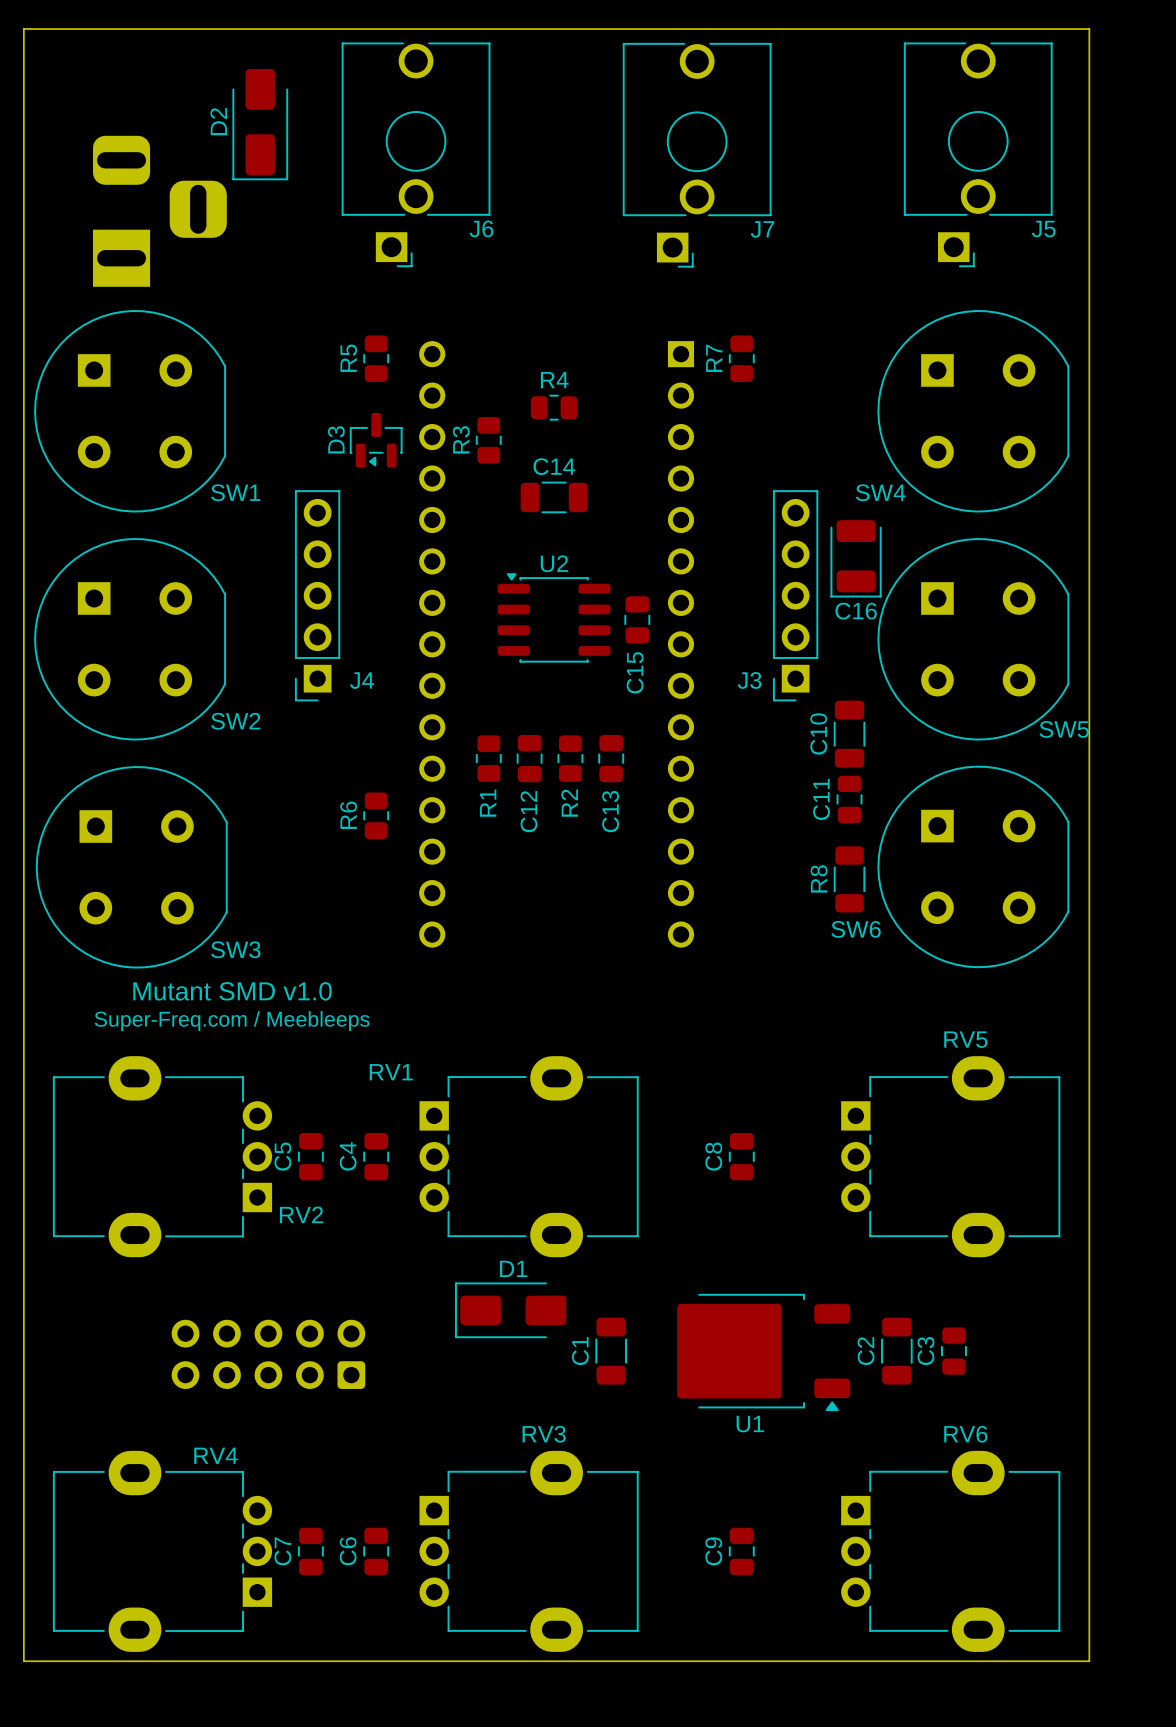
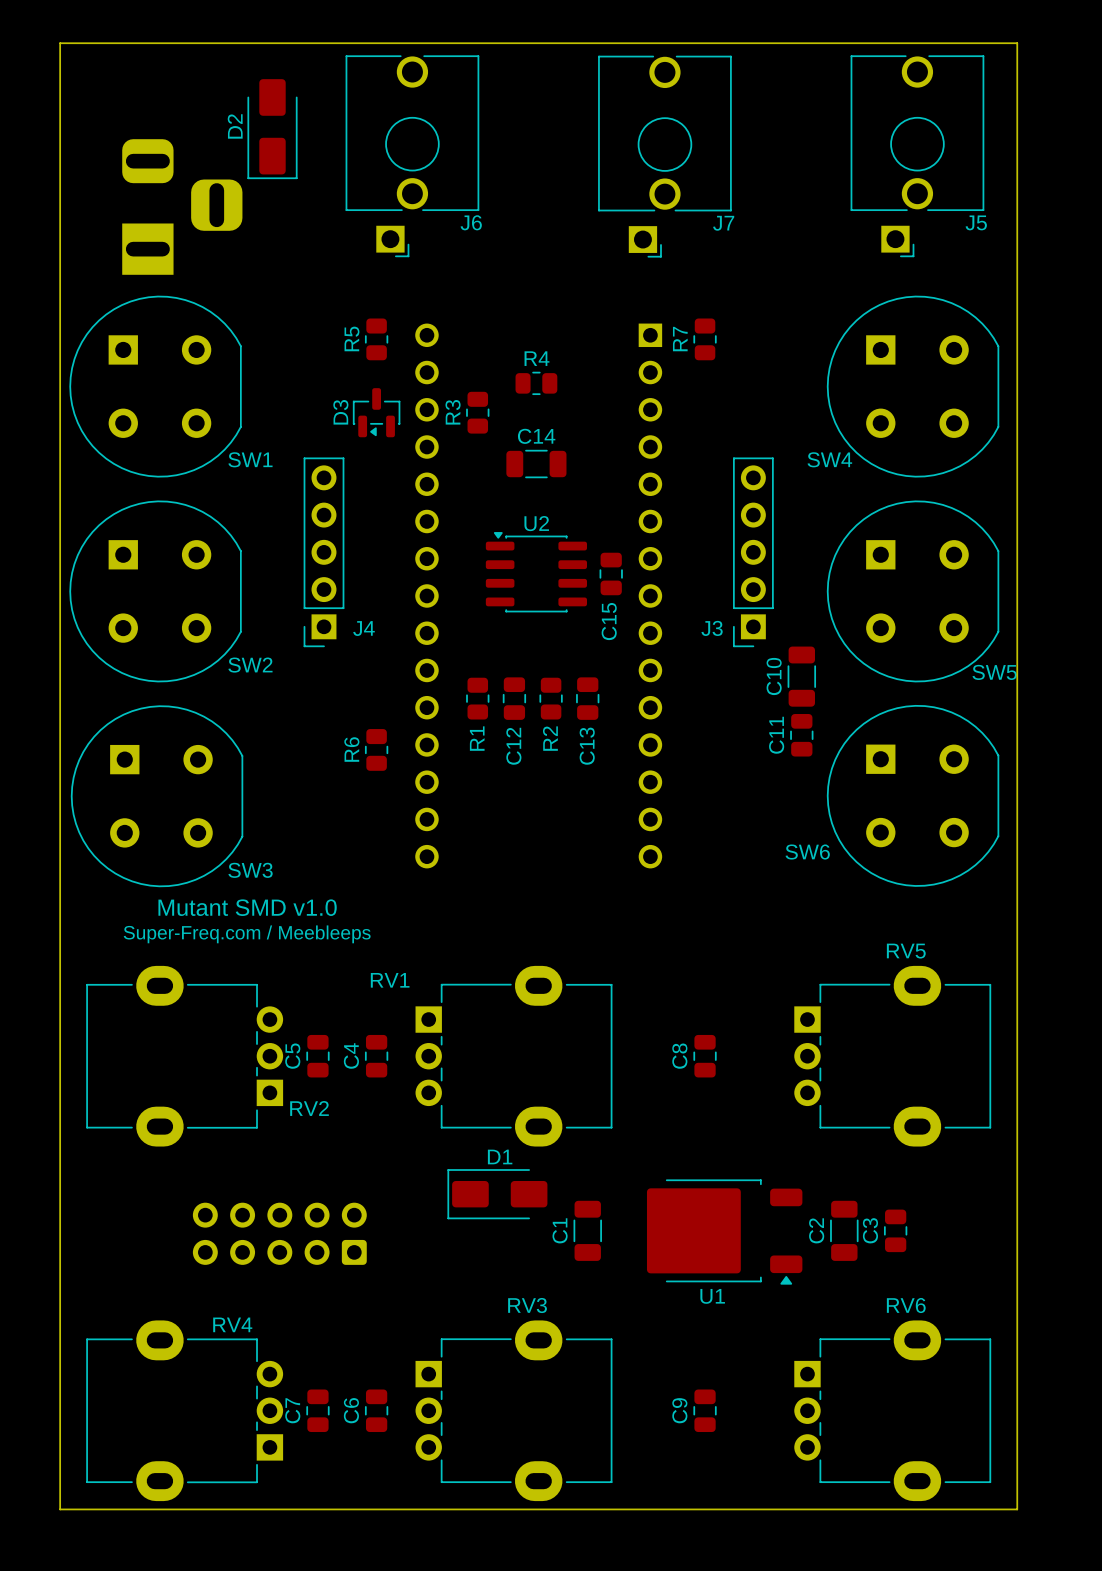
C16: (856, 558) -> none
R8: (849, 879) -> none

